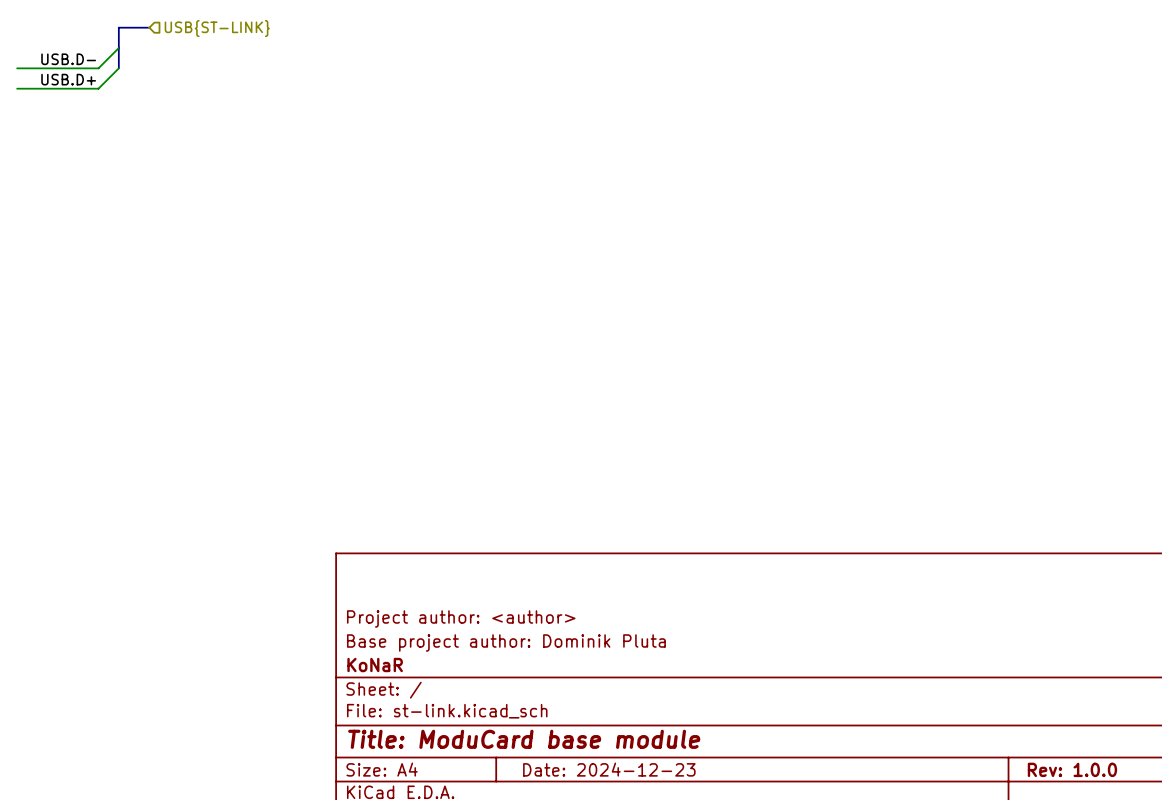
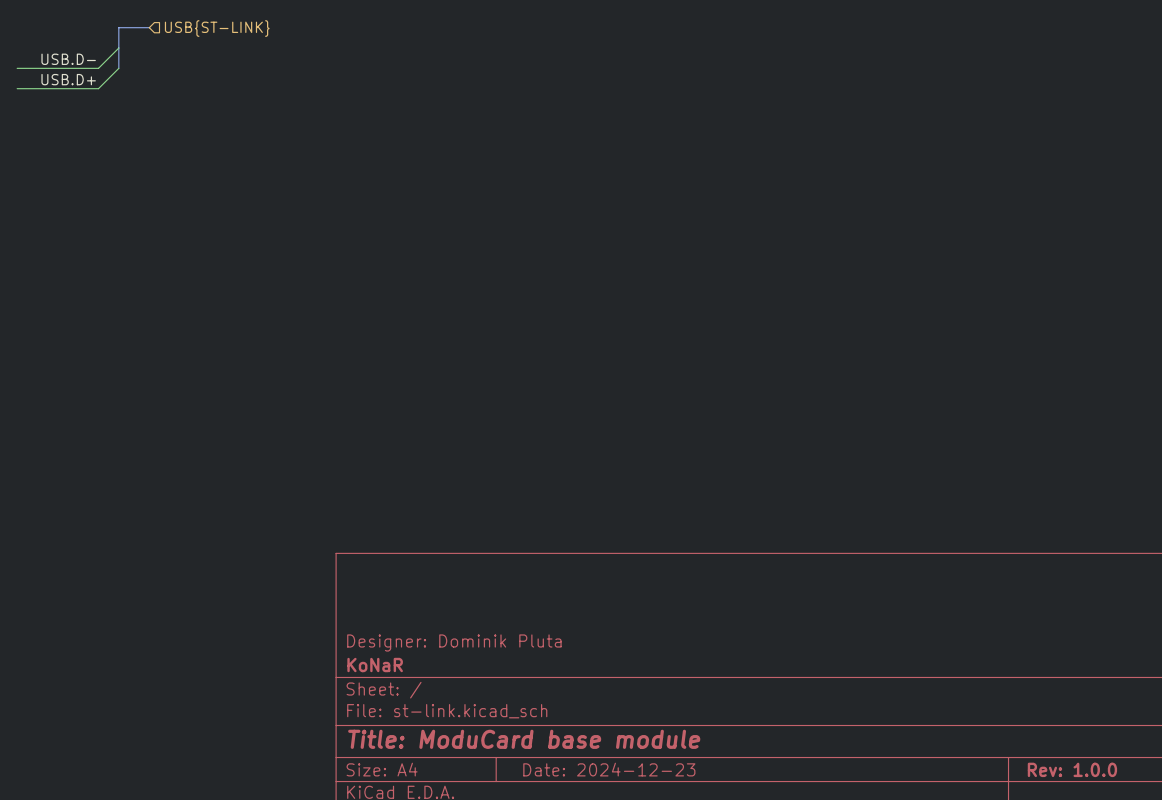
title block: Project author: <author> (461, 618) -> none
title block: Base project author: Dominik Pluta (506, 642) -> Designer: Dominik Pluta (454, 642)

